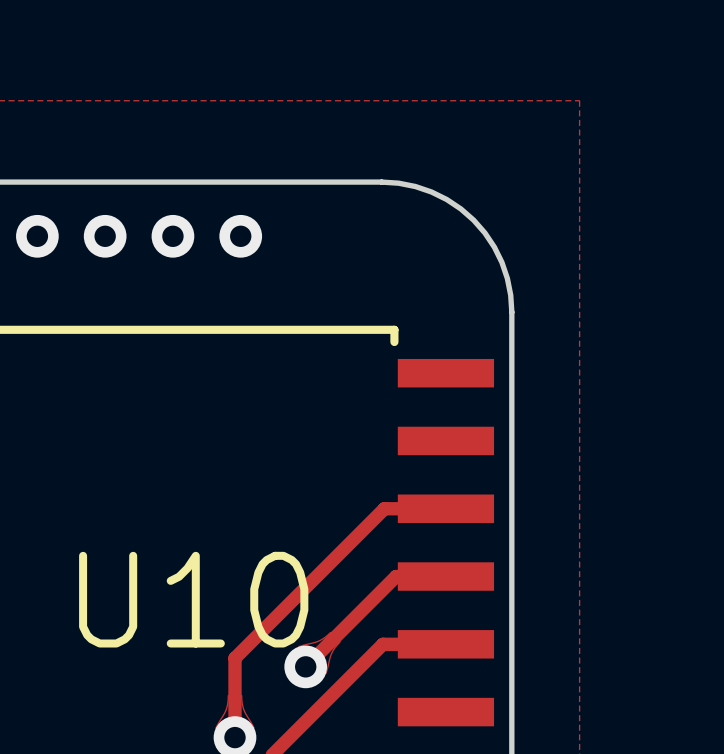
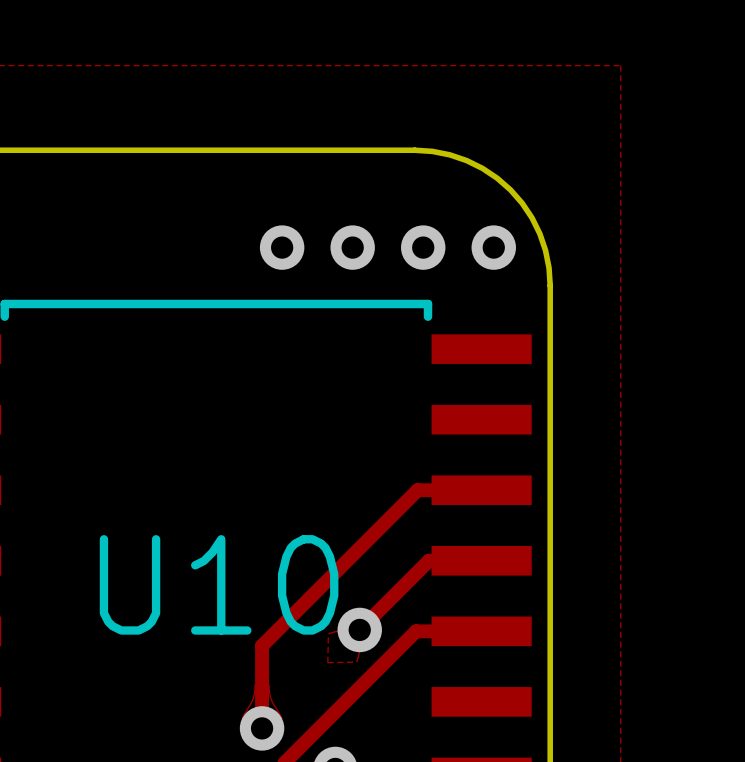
via: (37, 236) -> none
via: (105, 236) -> none
via: (172, 236) -> none
via position: (240, 236) -> (282, 247)
via: none -> (352, 247)
via: none -> (423, 247)
via: none -> (493, 247)
track: (396, 576) (305, 666) -> (428, 560) (359, 629)
via position: (305, 666) -> (359, 629)

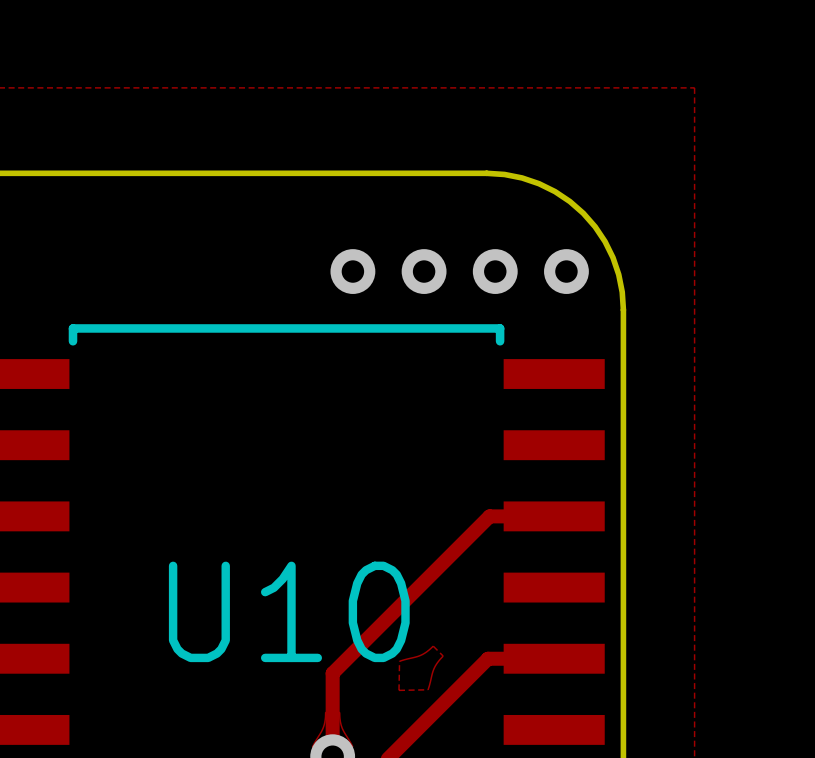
track: (481, 560) (428, 560) (359, 629) -> none
via: (359, 629) -> none

